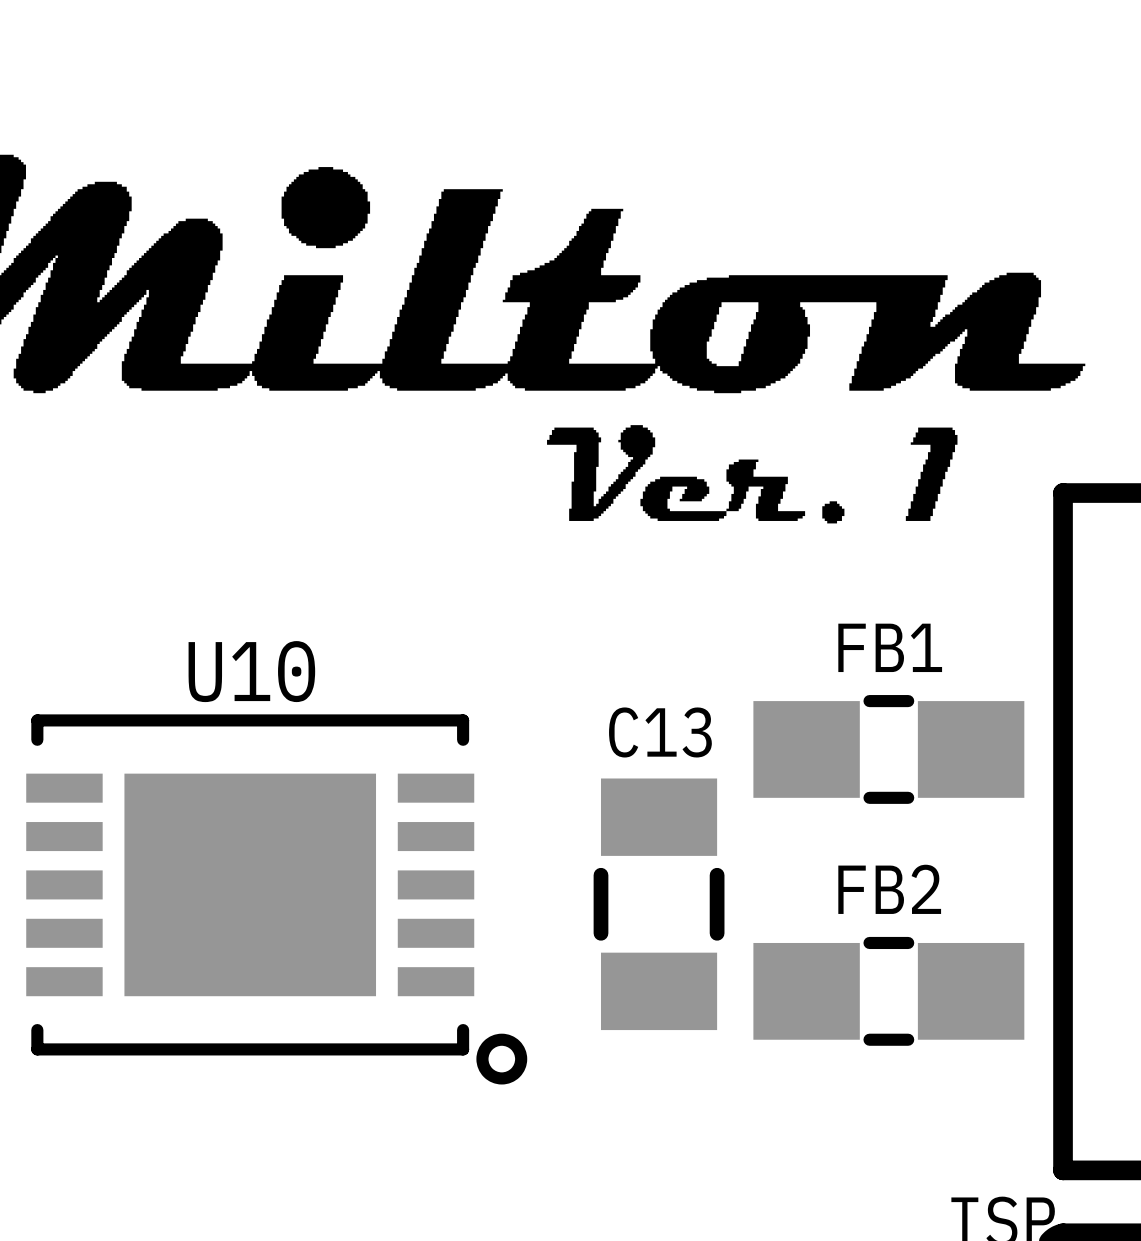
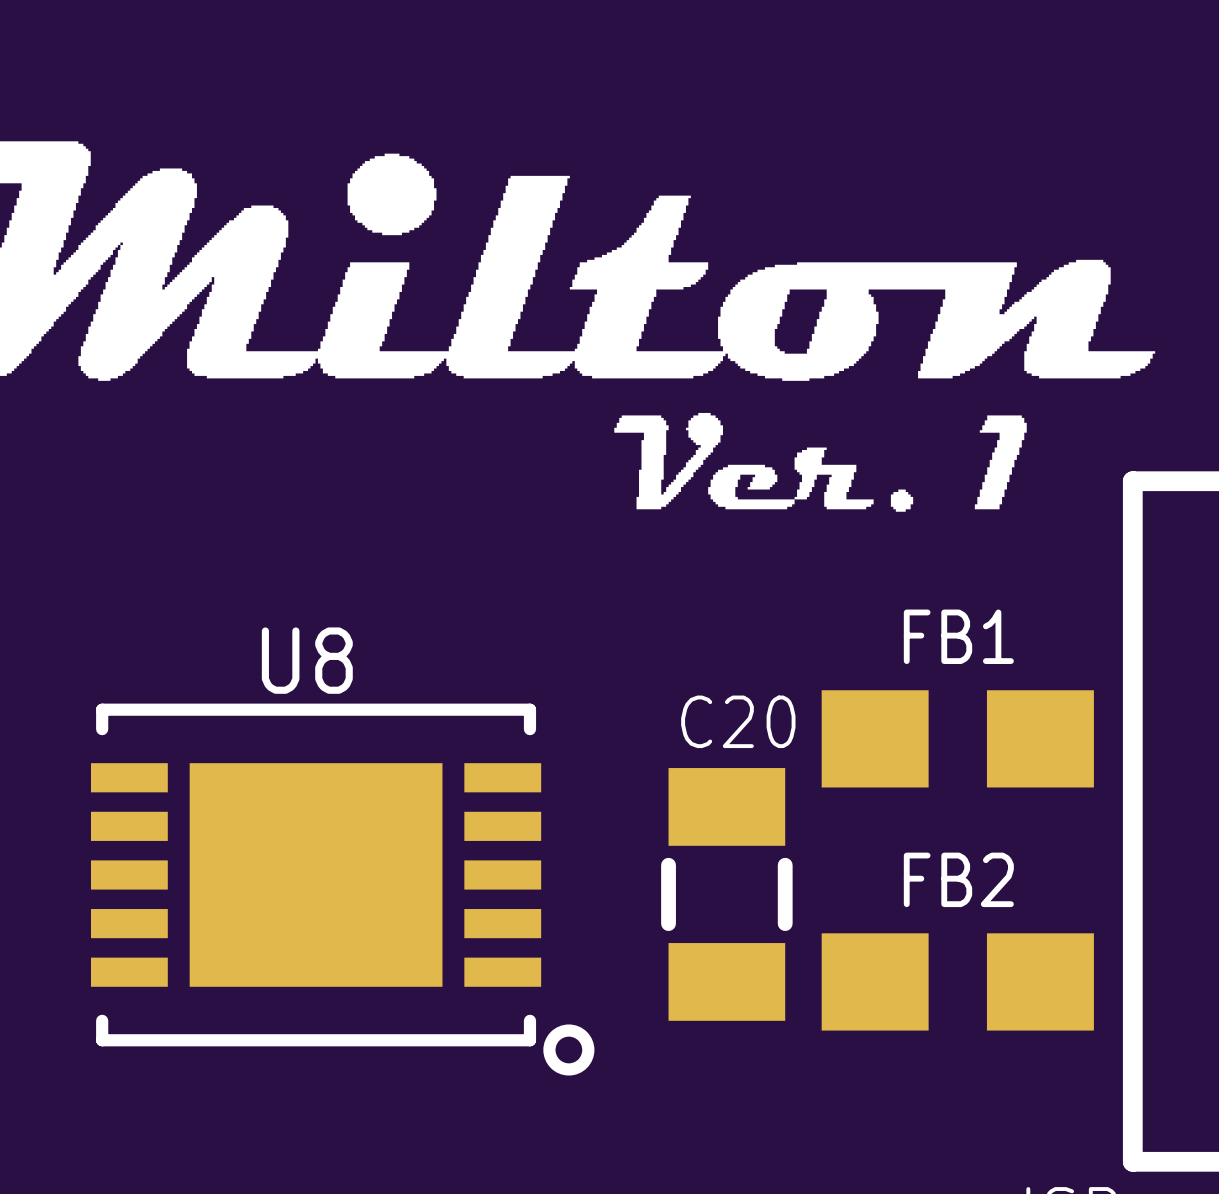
U10 name: U10 (251, 671) -> U8 (307, 660)
FB1 footprint: [753, 695, 1025, 804] -> [821, 690, 1094, 788]
C13 name: C13 (660, 732) -> C20 (738, 721)
FB2 footprint: [753, 936, 1025, 1046] -> [821, 933, 1094, 1031]

